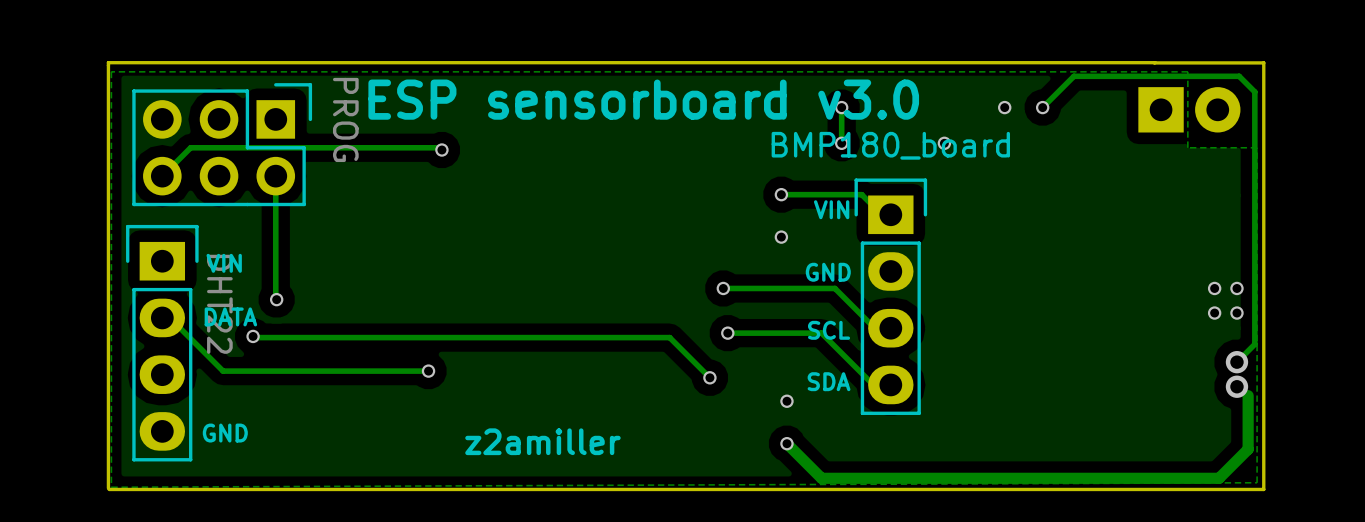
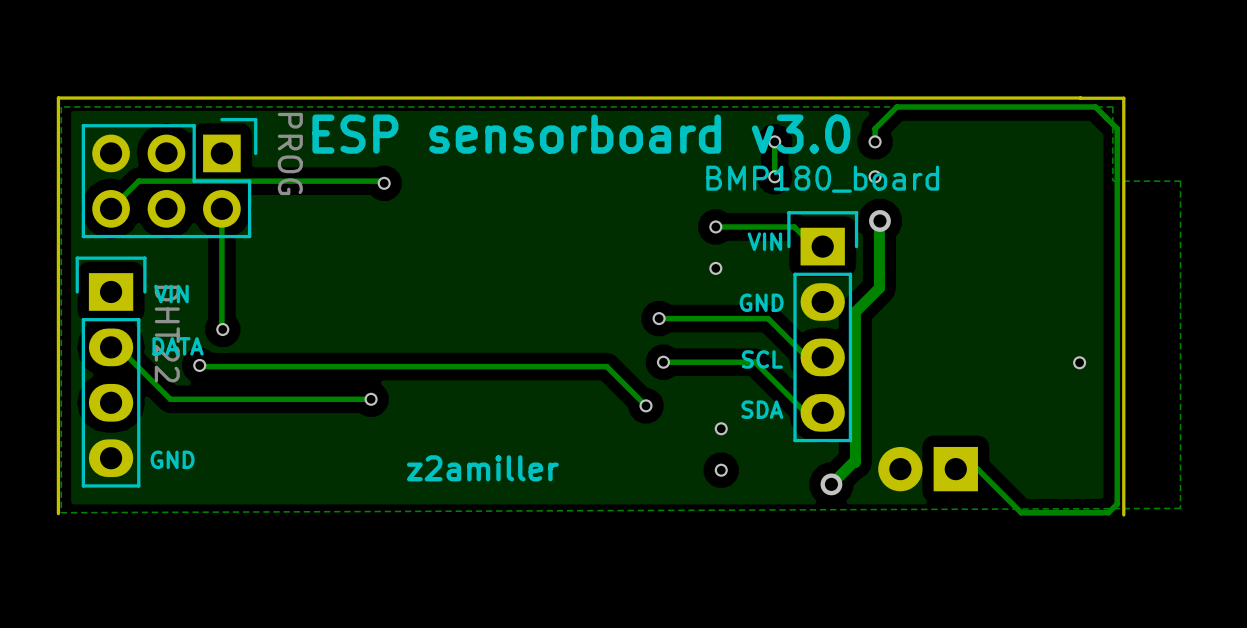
board edge: (1199, 62) (1263, 62) (1263, 489) (109, 489) -> (1123, 98) (1123, 514)
track: none -> (875, 141) (875, 128) (896, 106) (1095, 106) (1117, 128) (1117, 504) (1108, 512) (1021, 512) (977, 469) (955, 469)
via: none -> (875, 141)
via: (1004, 107) -> none
track: (1042, 107) (1073, 76) (1239, 76) (1254, 91) (1254, 344) (1236, 362) -> none
via: (1042, 107) -> none
part rotation: 0° (1189, 109) -> 180° (928, 469)
part position: (1189, 109) -> (928, 469)
track: none -> (879, 220) (879, 288) (855, 312) (855, 462)
via: none -> (879, 220)
via: (1214, 288) -> none
via: (1236, 288) -> none
via: (1214, 313) -> none
via: (1236, 313) -> none
via: none -> (1079, 362)
via: (1236, 362) -> none
via: (1236, 386) -> none
track: (1248, 395) (1248, 449) (1219, 478) (821, 478) (786, 443) -> none
track: none -> (855, 460) (831, 484)
via: none -> (831, 484)

